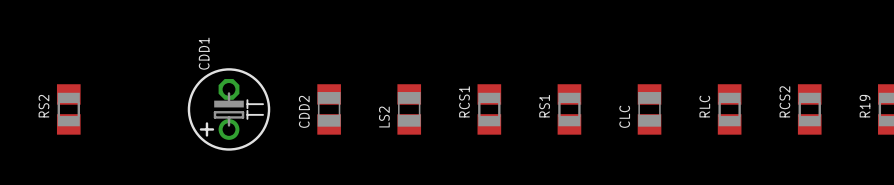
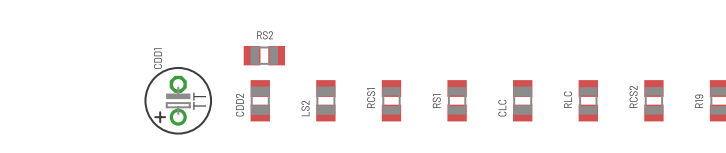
RS2 rotation: 0° (68, 109) -> 90° clockwise (264, 55)
RS2 position: (68, 109) -> (264, 55)

